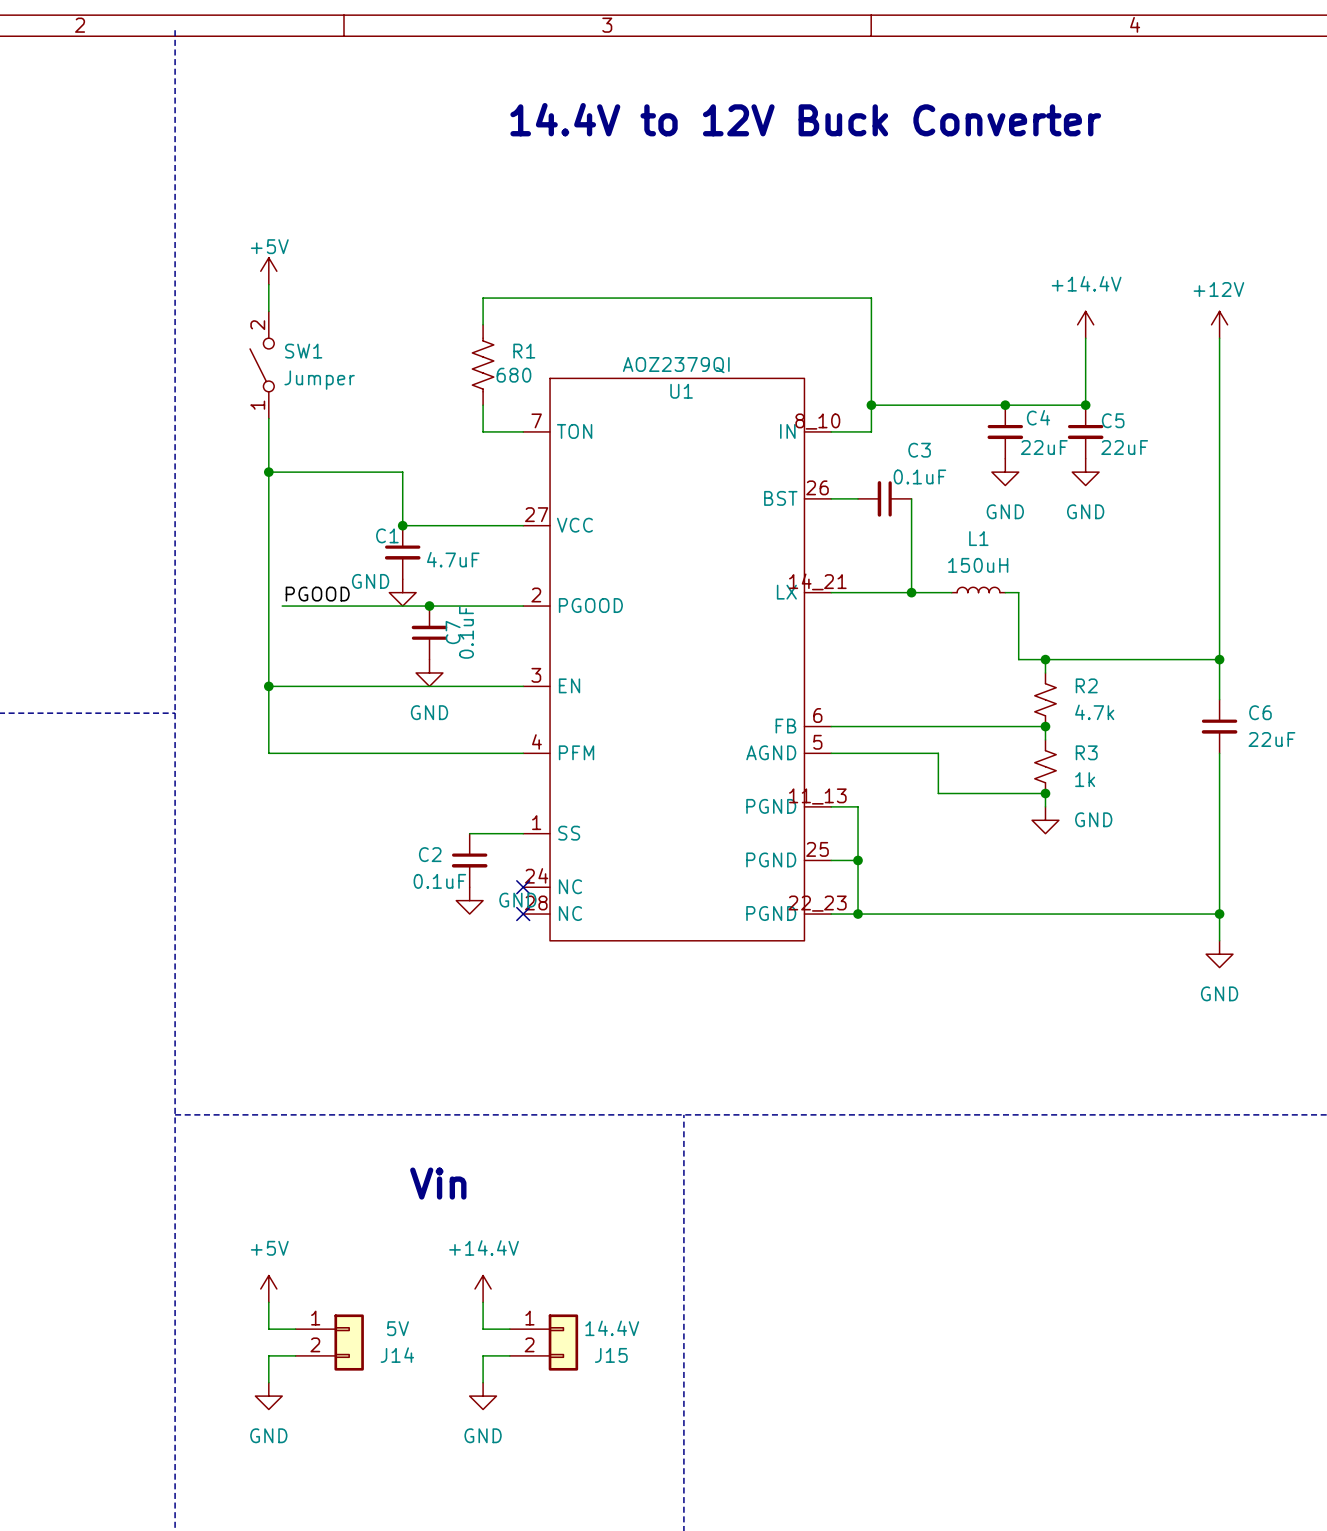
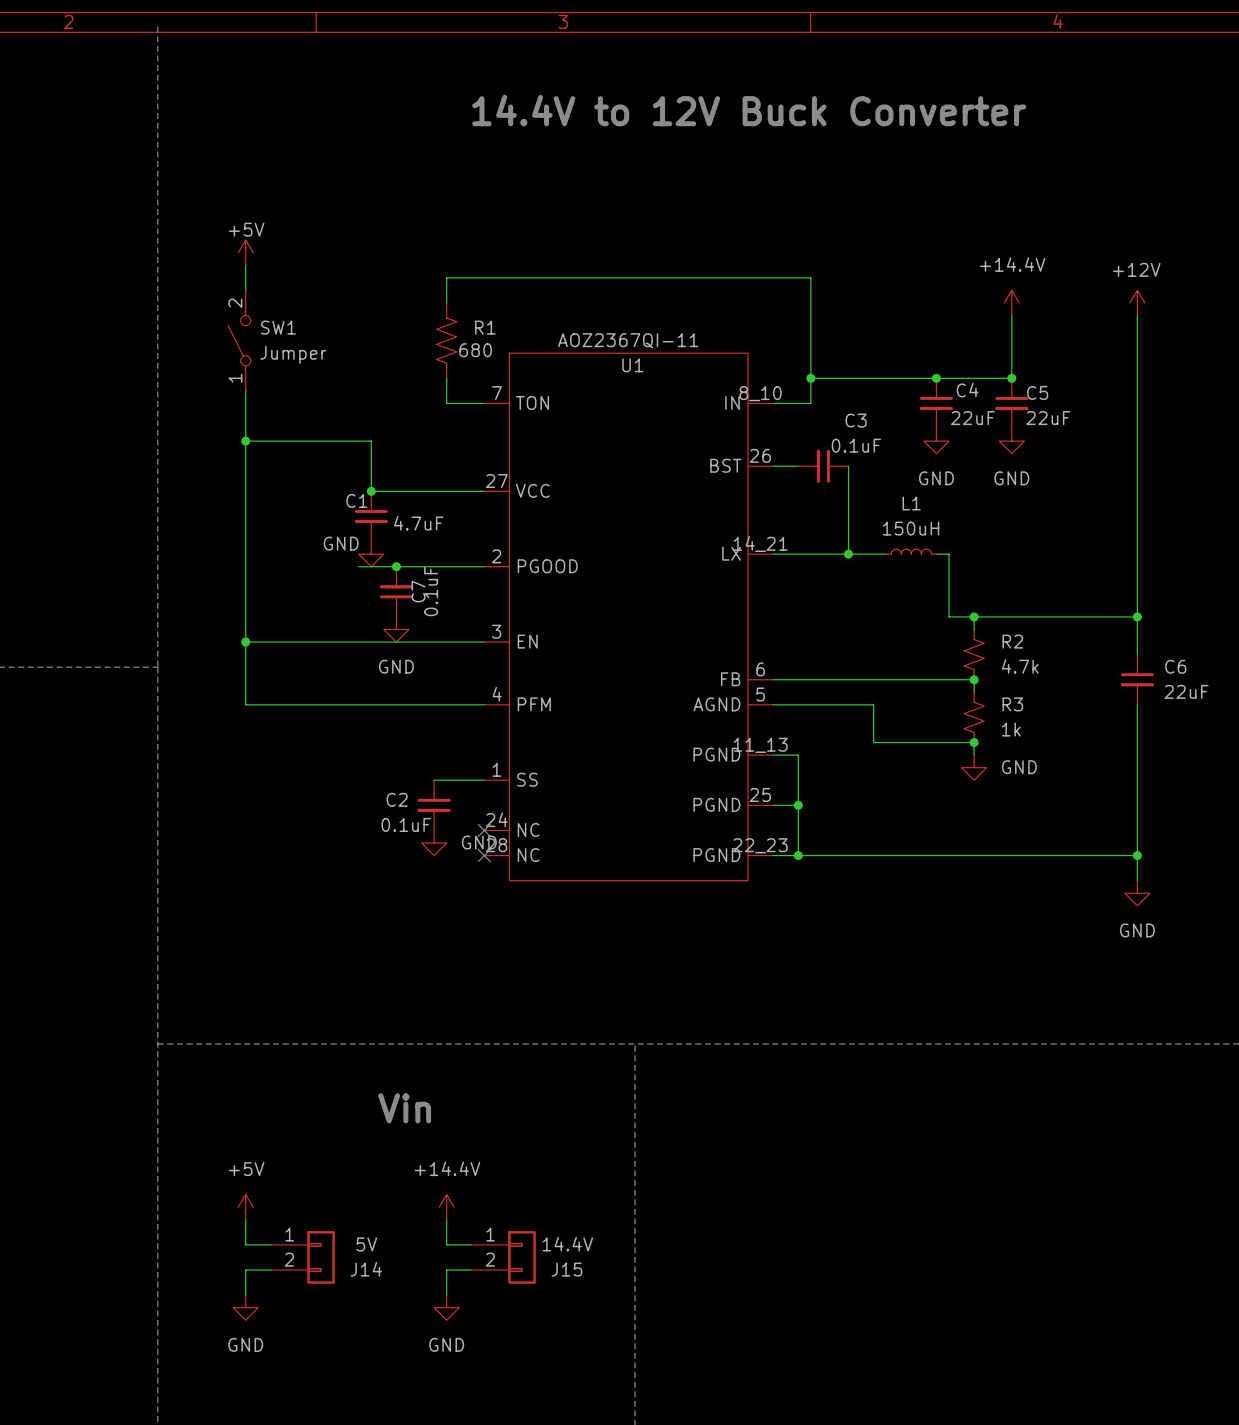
U1 value: AOZ2379QI (676, 365) -> AOZ2367QI-11 (628, 340)
label: PGOOD (317, 594) -> none
wire: (282, 606) (389, 606) -> none

